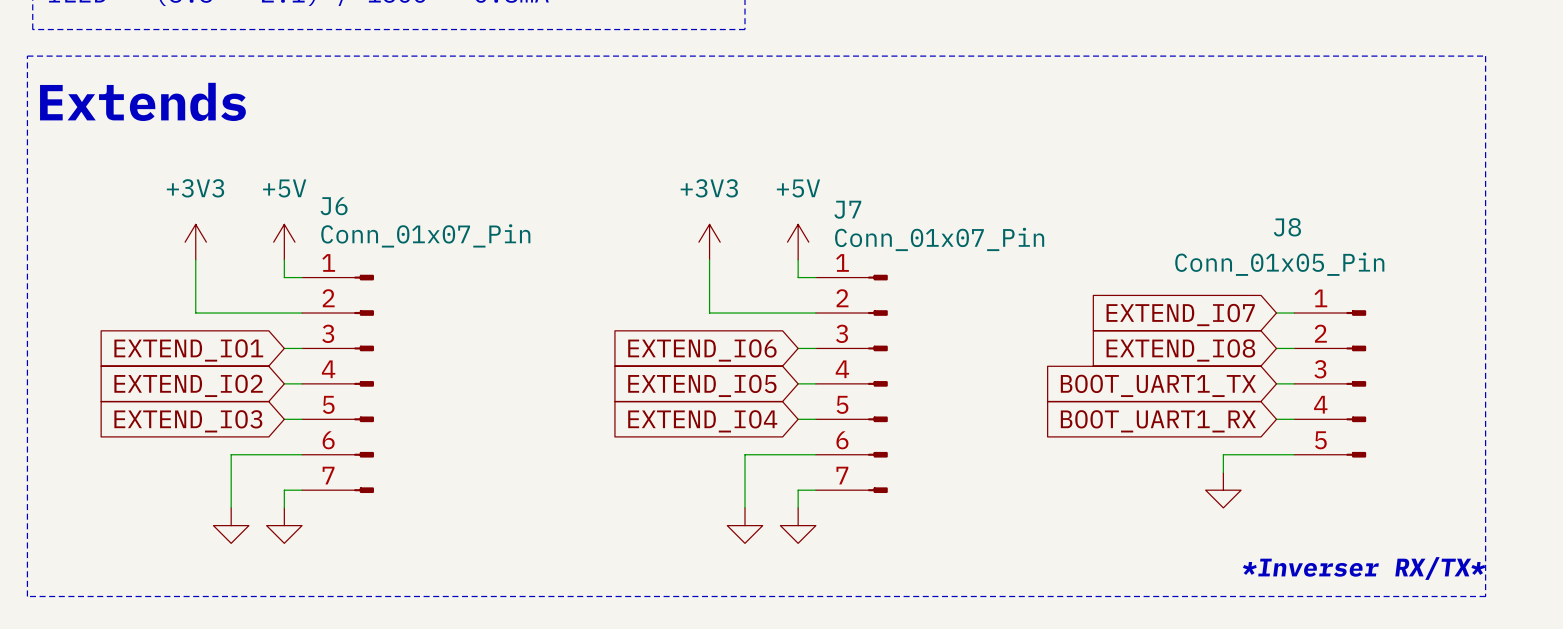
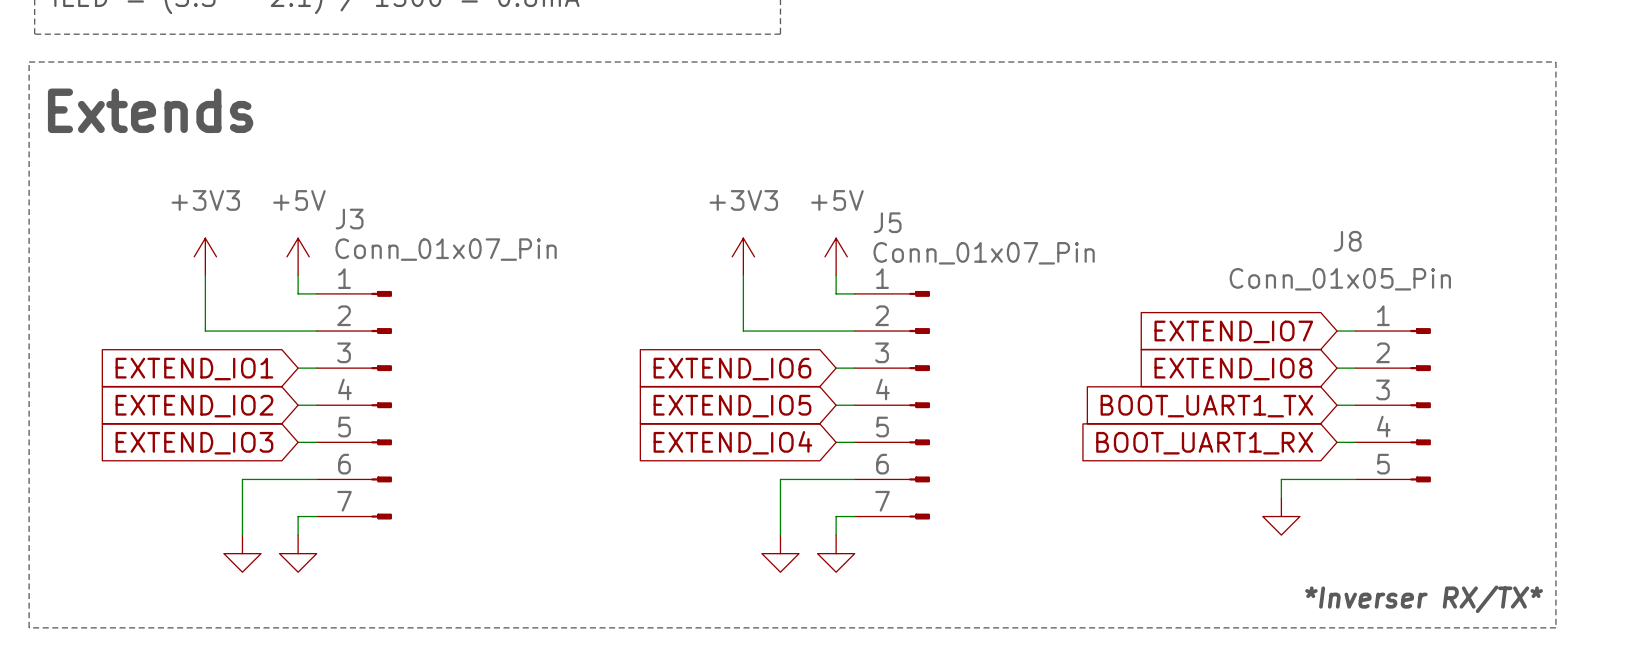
J6 name: J6 (334, 206) -> J3 (349, 219)
J7 name: J7 (847, 209) -> J5 (887, 222)

